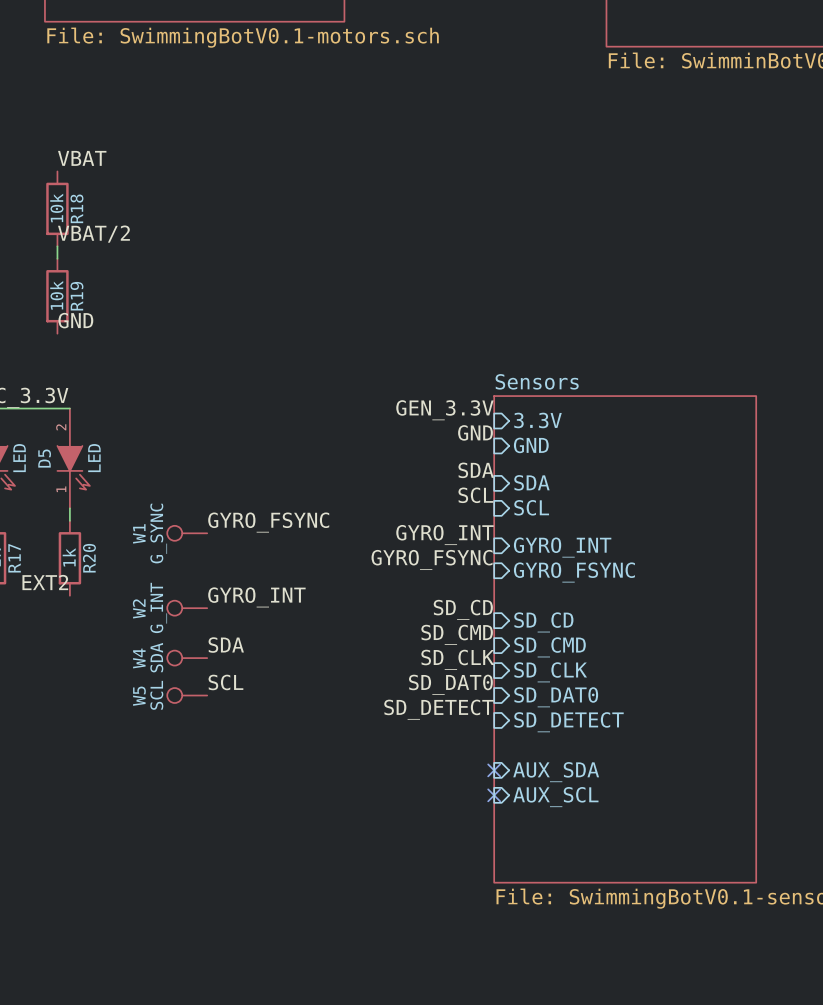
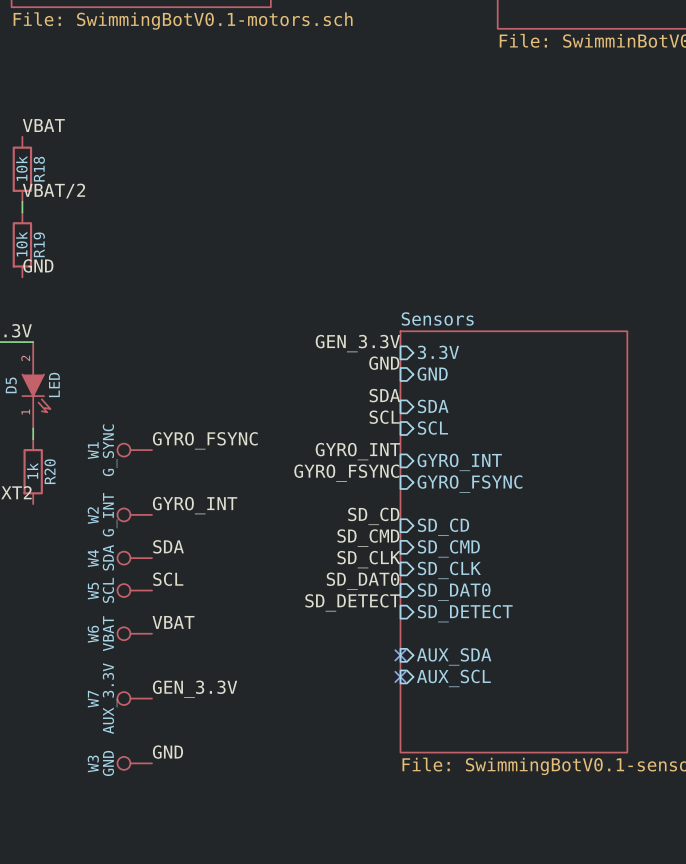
label: none -> VBAT (173, 622)
W6: none -> VBAT (134, 633)
label: none -> GEN_3.3V (195, 689)
W7: none -> AUX_3.3V (134, 698)
label: none -> GND (167, 752)
W3: none -> GND (134, 763)

